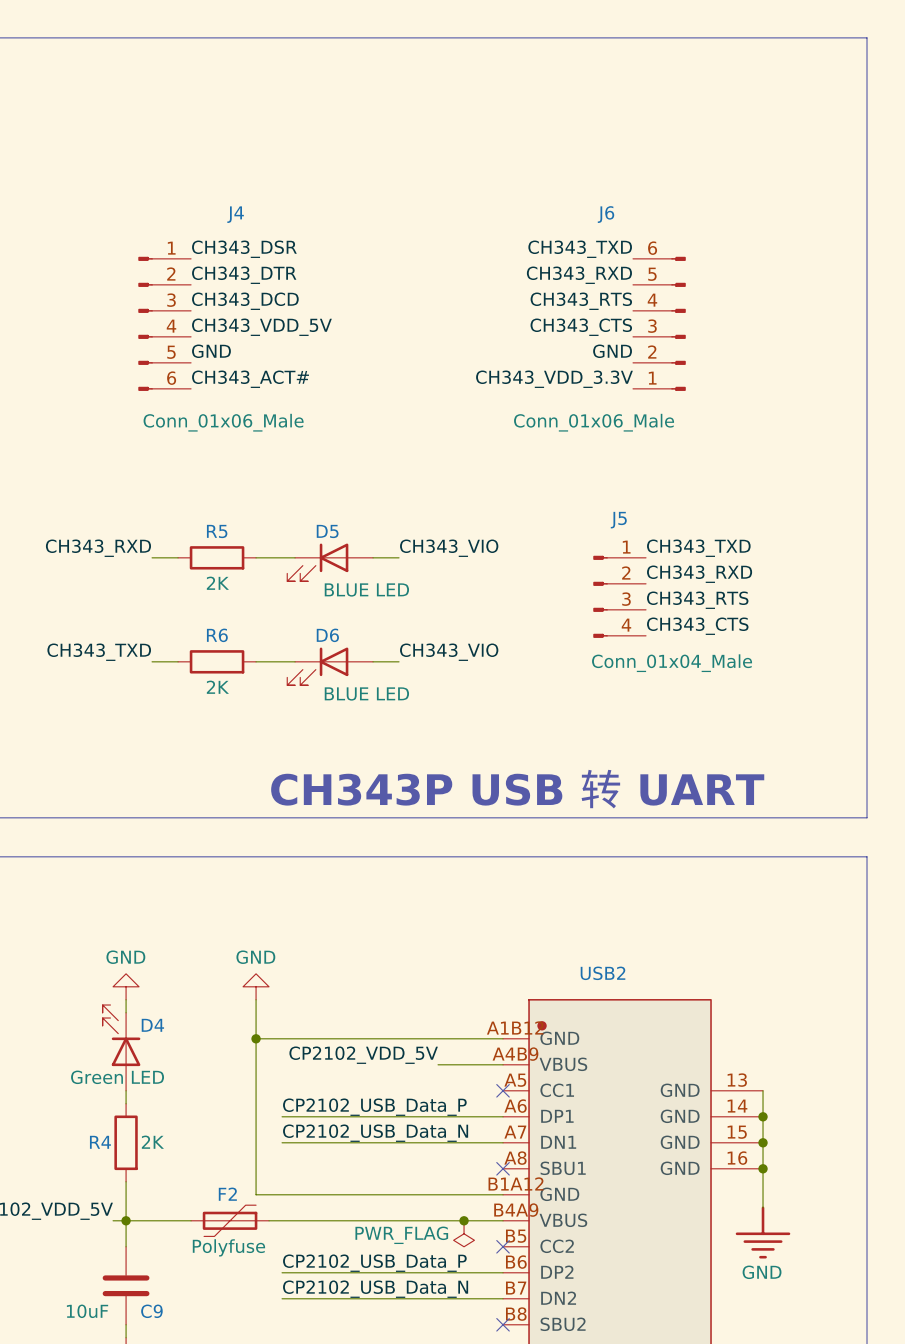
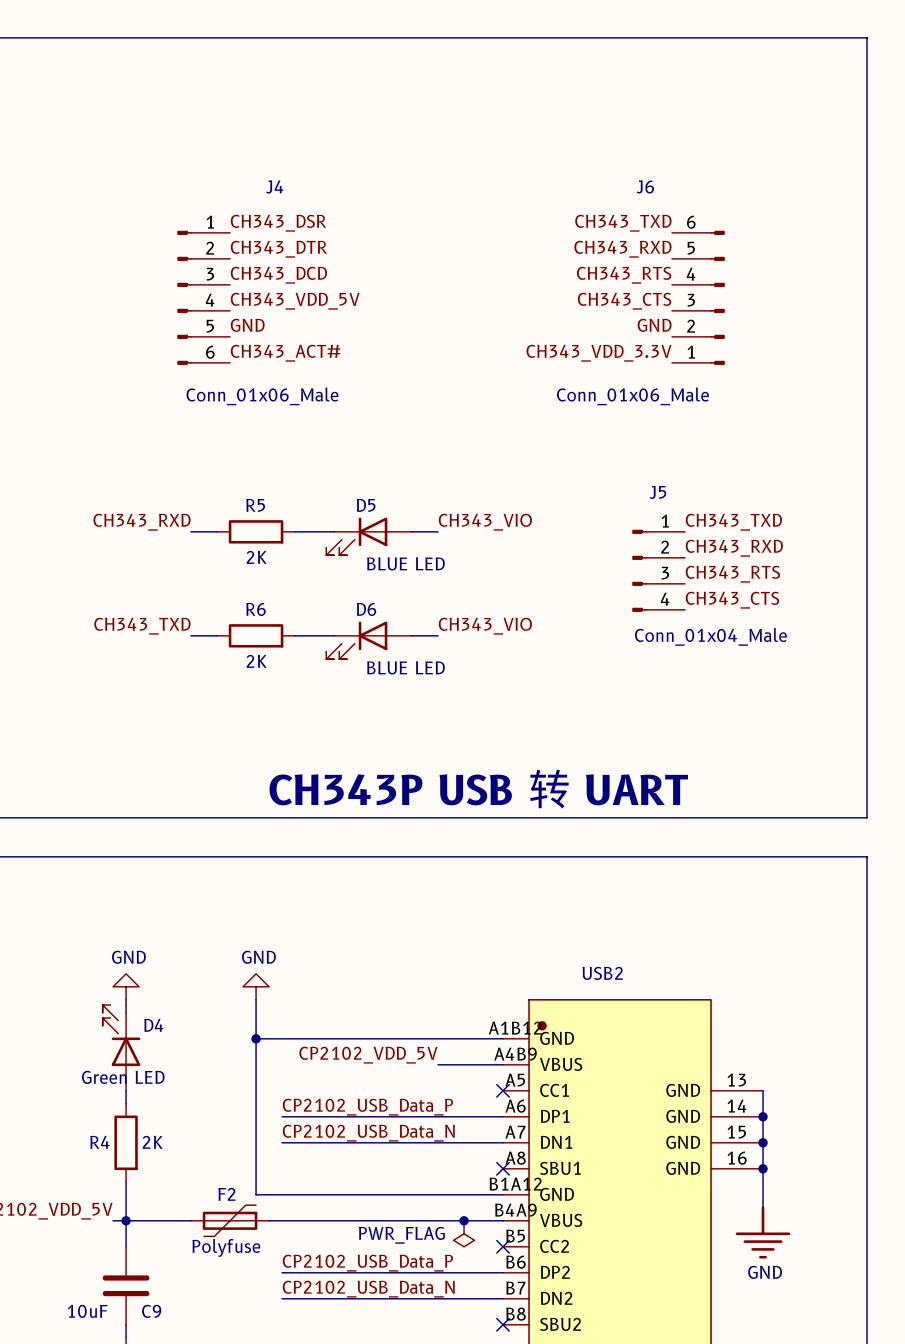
label position: CH343_DSR (244, 249) -> CH343_DSR (278, 223)
label position: CH343_TXD (580, 249) -> CH343_TXD (623, 223)
label position: CH343_DTR (244, 275) -> CH343_DTR (278, 249)
label position: CH343_RXD (579, 275) -> CH343_RXD (622, 249)
label position: CH343_DCD (245, 301) -> CH343_DCD (278, 275)
label position: CH343_RTS (581, 301) -> CH343_RTS (624, 275)
J4 position: (164, 323) -> (203, 297)
J6 position: (659, 323) -> (698, 297)
label position: CH343_VDD_5V (261, 327) -> CH343_VDD_5V (295, 301)
label position: CH343_CTS (581, 327) -> CH343_CTS (624, 301)
label position: GND (211, 351) -> GND (247, 325)
label position: GND (612, 351) -> GND (654, 325)
label position: CH343_ACT# (250, 379) -> CH343_ACT# (285, 353)
label position: CH343_VDD_3.3V (554, 379) -> CH343_VDD_3.3V (599, 353)
label position: CH343_RXD (98, 548) -> CH343_RXD (142, 522)
label position: CH343_VIO (449, 548) -> CH343_VIO (485, 522)
label position: CH343_TXD (698, 548) -> CH343_TXD (733, 522)
wire: (152, 557) (178, 557) -> (191, 531) (217, 531)
R5 position: (217, 557) -> (256, 531)
wire: (256, 557) (295, 557) -> (295, 531) (334, 531)
wire: (373, 557) (399, 557) -> (412, 531) (438, 531)
D5 position: (330, 562) -> (369, 536)
label position: CH343_RXD (699, 574) -> CH343_RXD (734, 548)
J5 position: (619, 596) -> (658, 570)
label position: CH343_RTS (697, 600) -> CH343_RTS (732, 574)
label position: CH343_CTS (697, 626) -> CH343_CTS (732, 600)
label position: CH343_TXD (99, 652) -> CH343_TXD (142, 626)
label position: CH343_VIO (449, 652) -> CH343_VIO (485, 626)
wire: (152, 661) (178, 661) -> (191, 635) (217, 635)
R6 position: (217, 661) -> (256, 635)
wire: (256, 661) (295, 661) -> (295, 635) (334, 635)
wire: (373, 661) (399, 661) -> (412, 635) (438, 635)
D6 position: (330, 666) -> (369, 640)

